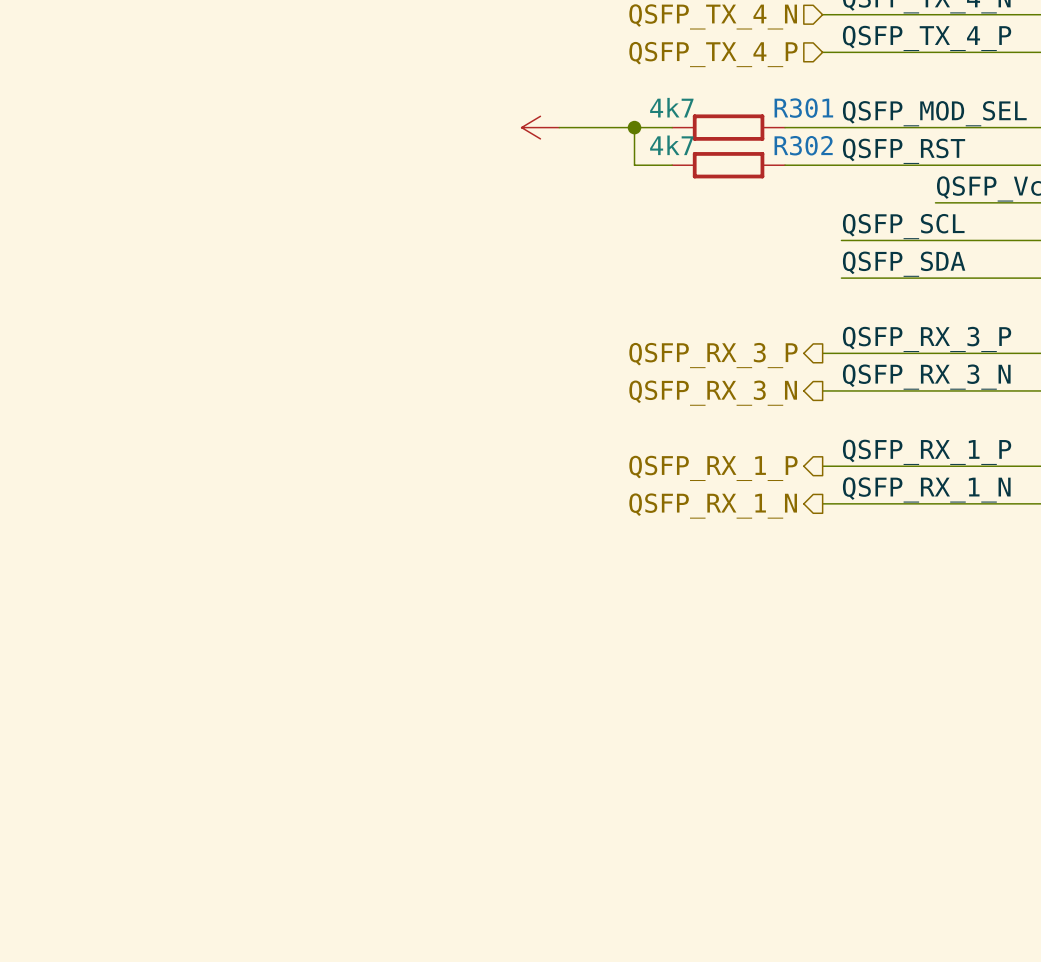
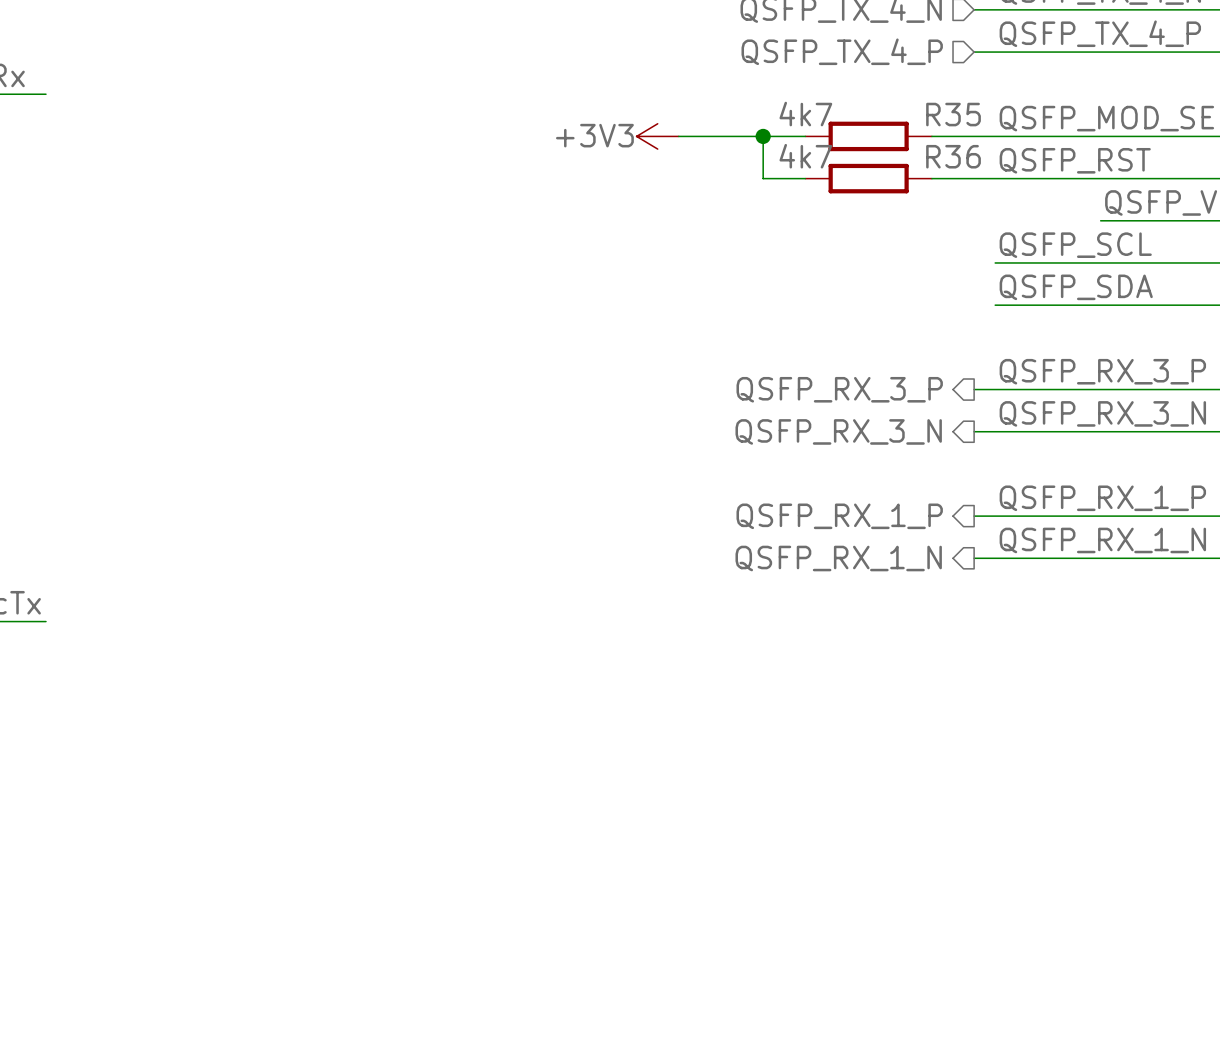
R301 name: R301 (803, 108) -> R35 (953, 114)
power symbol text: none -> +3V3 (594, 135)
R302 name: R302 (803, 145) -> R36 (953, 156)

